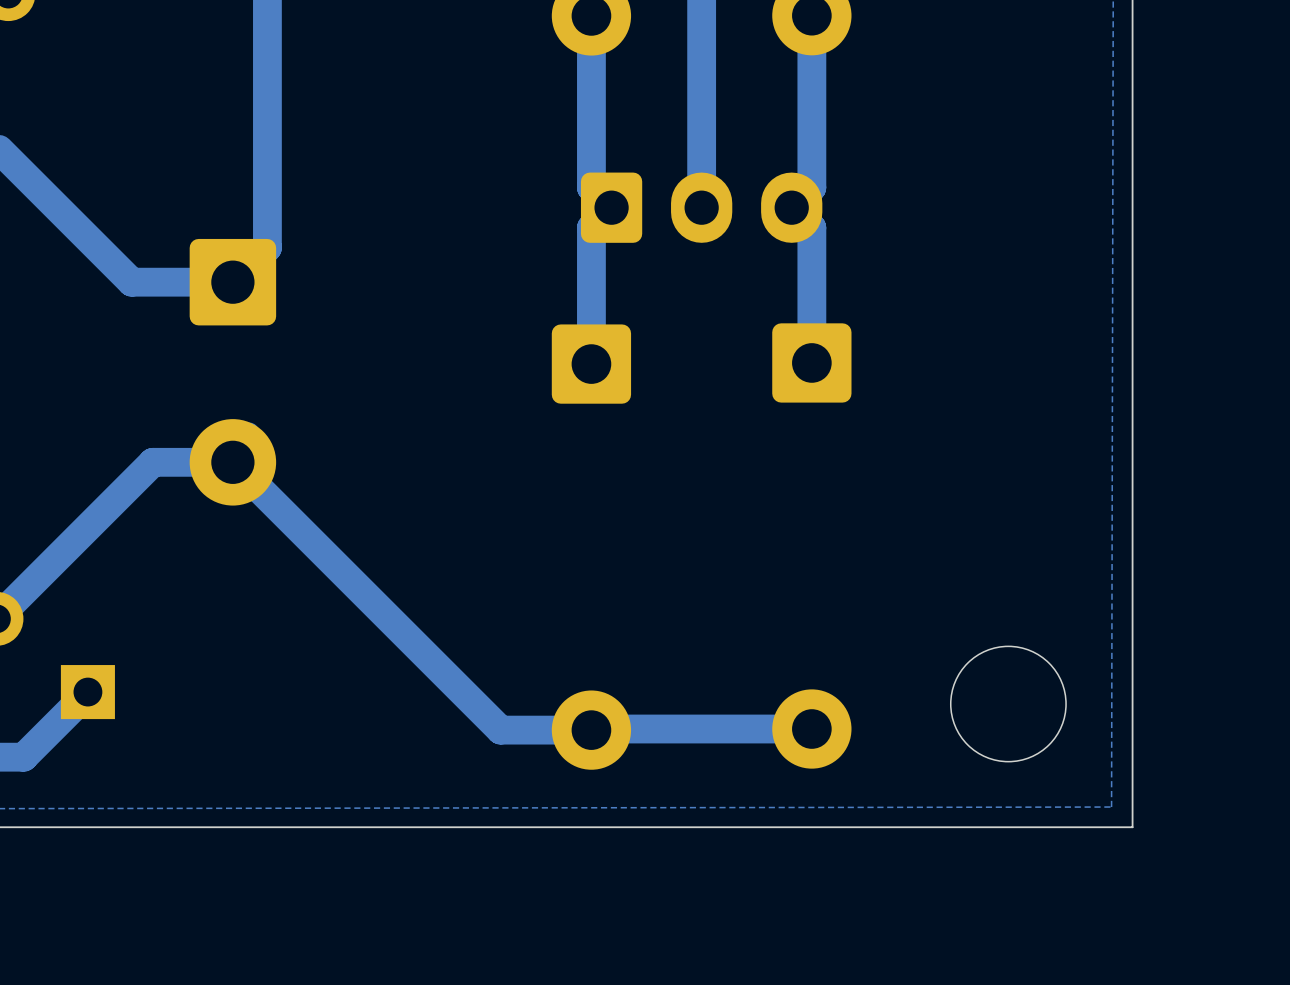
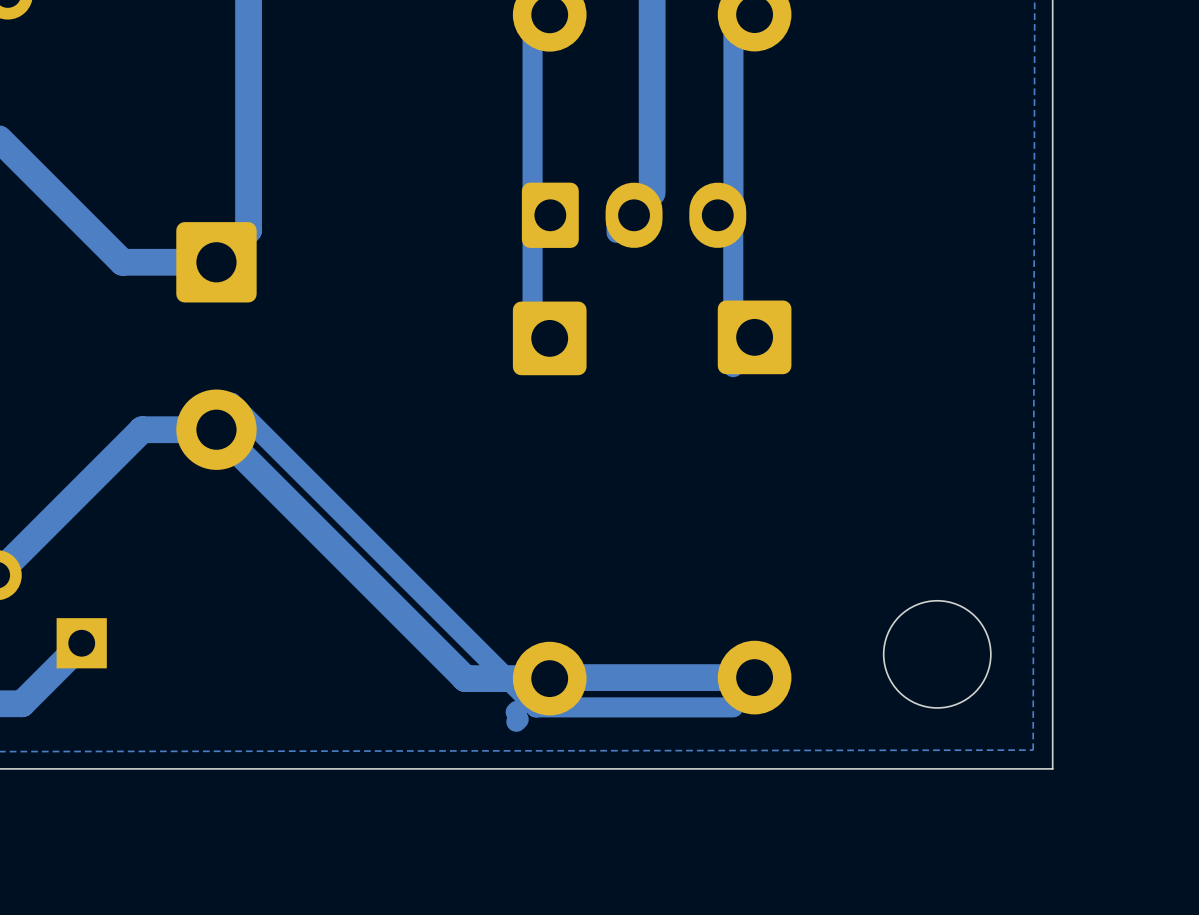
bottom track: (591, 15) (591, 187) (611, 207) (591, 227) (591, 364) -> none
bottom track: (811, 15) (811, 187) (791, 207) (811, 227) (811, 362) -> none
bottom track: none -> (532, 32) (532, 197) (550, 215) (532, 233) (532, 363)
bottom track: none -> (733, 34) (733, 199) (717, 215) (733, 230) (733, 367)
part position: (701, 207) -> (634, 215)
bottom track: none -> (616, 215) (616, 232)
bottom track: none -> (231, 402) (536, 707) (733, 707)
bottom track: none -> (517, 710) (515, 712)
bottom track: none -> (518, 719) (516, 721)

